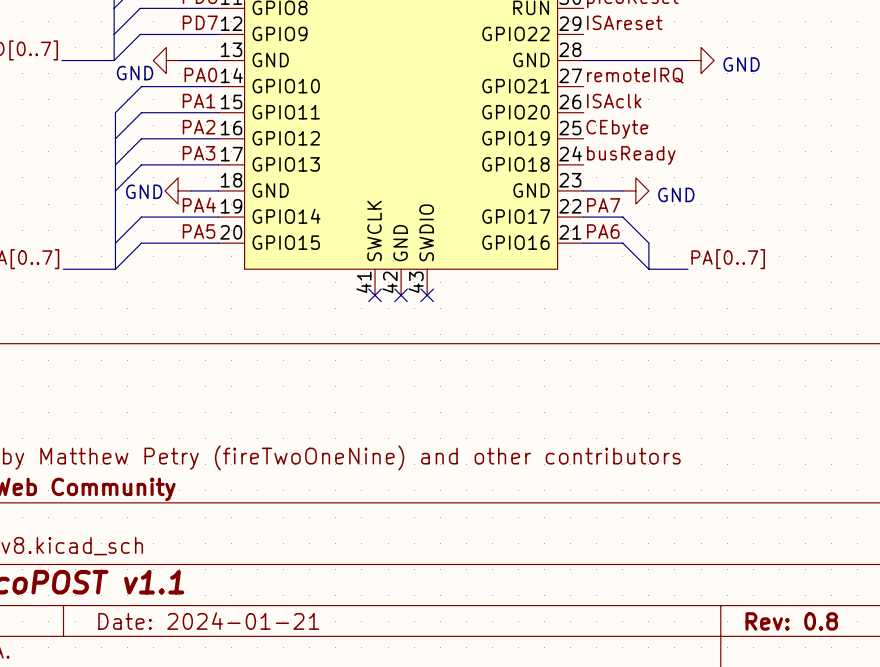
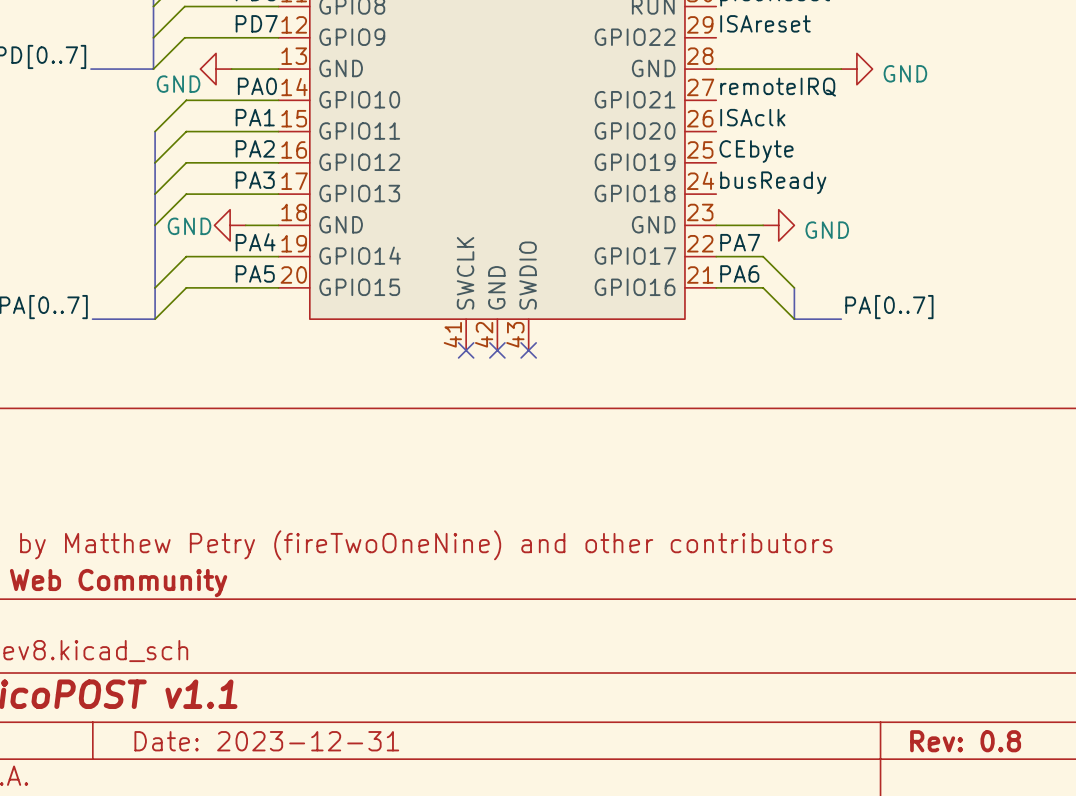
title block: Date: 2024-01-21 (208, 621) -> Date: 2023-12-31 (266, 741)

